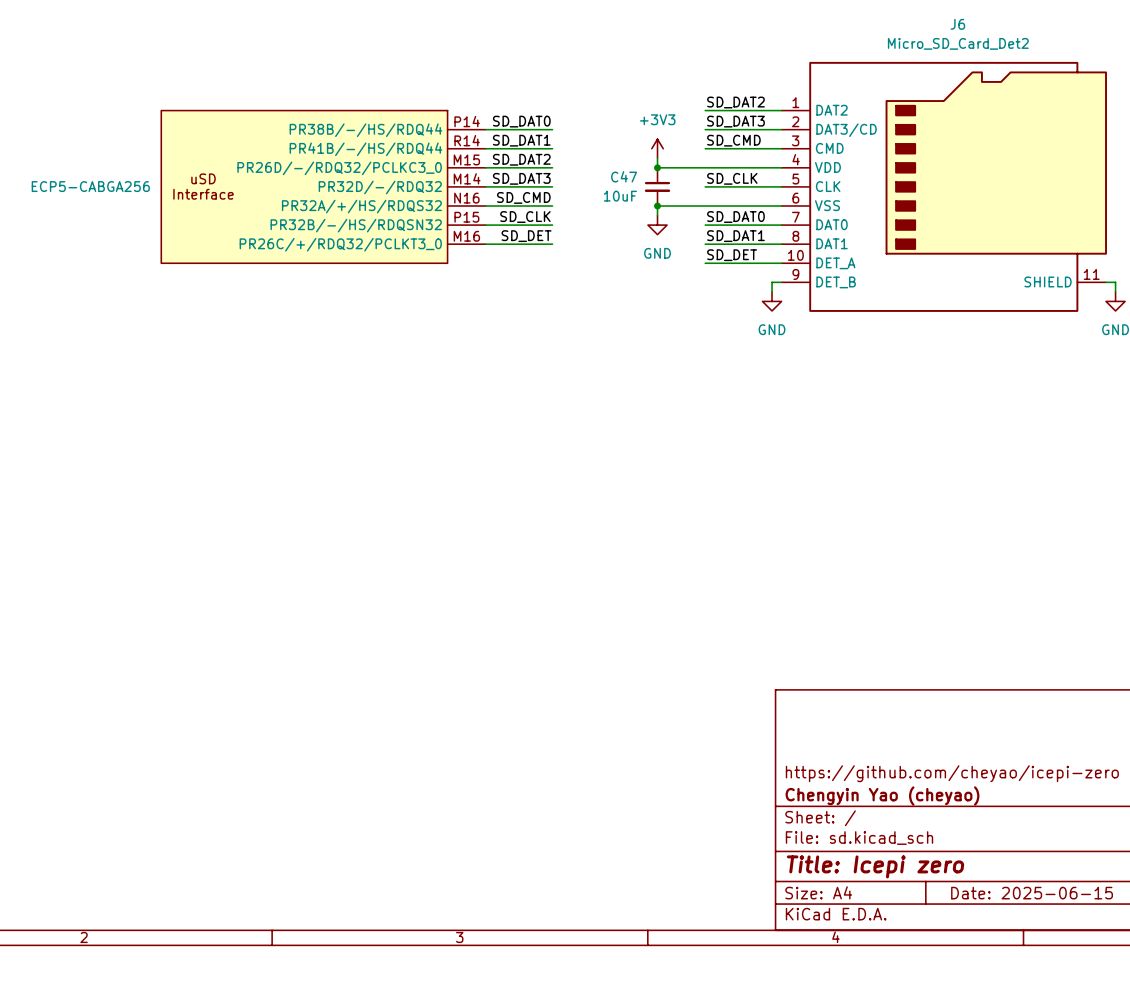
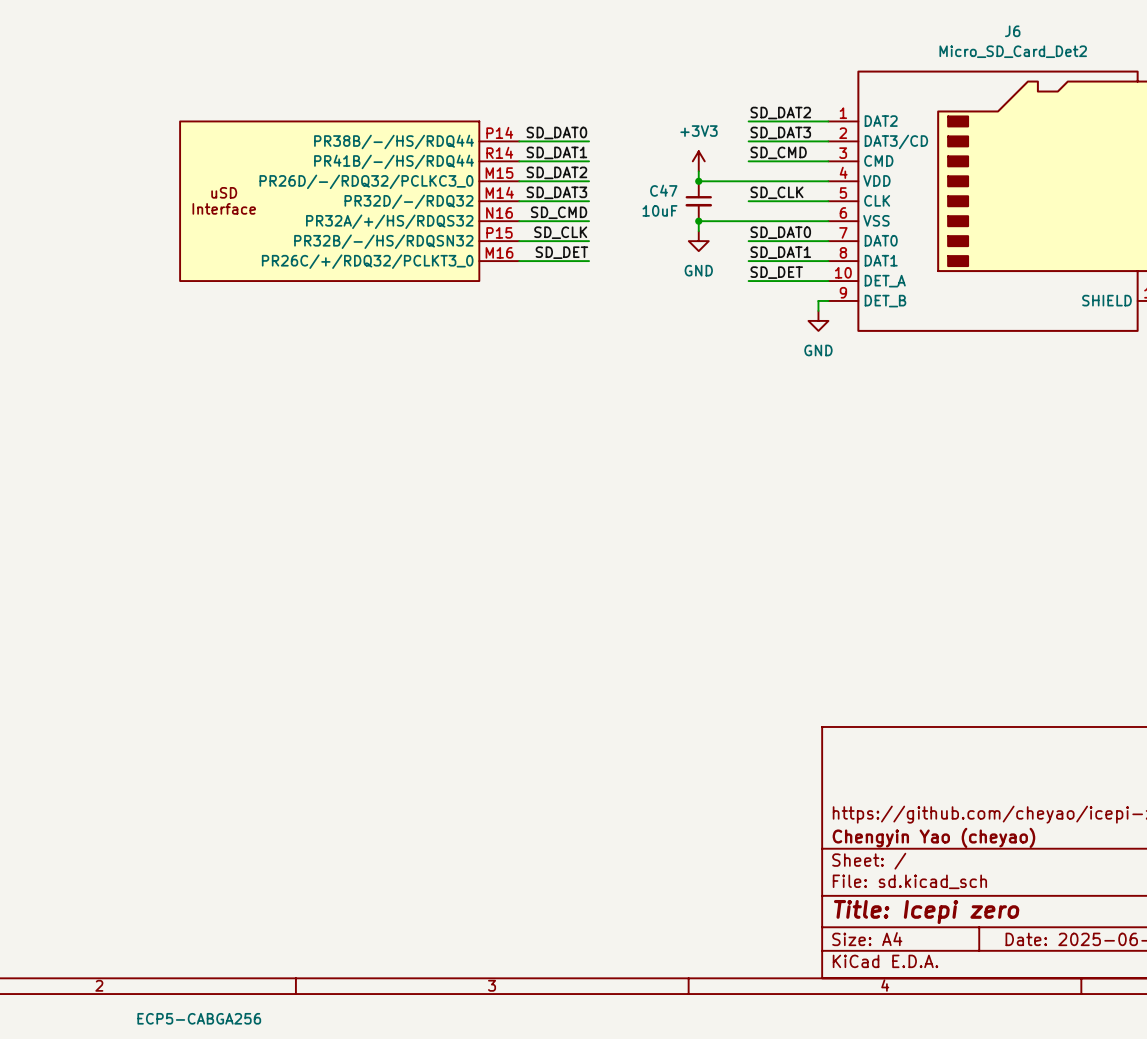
part value position: ECP5-CABGA256 (90, 186) -> ECP5-CABGA256 (199, 1018)

